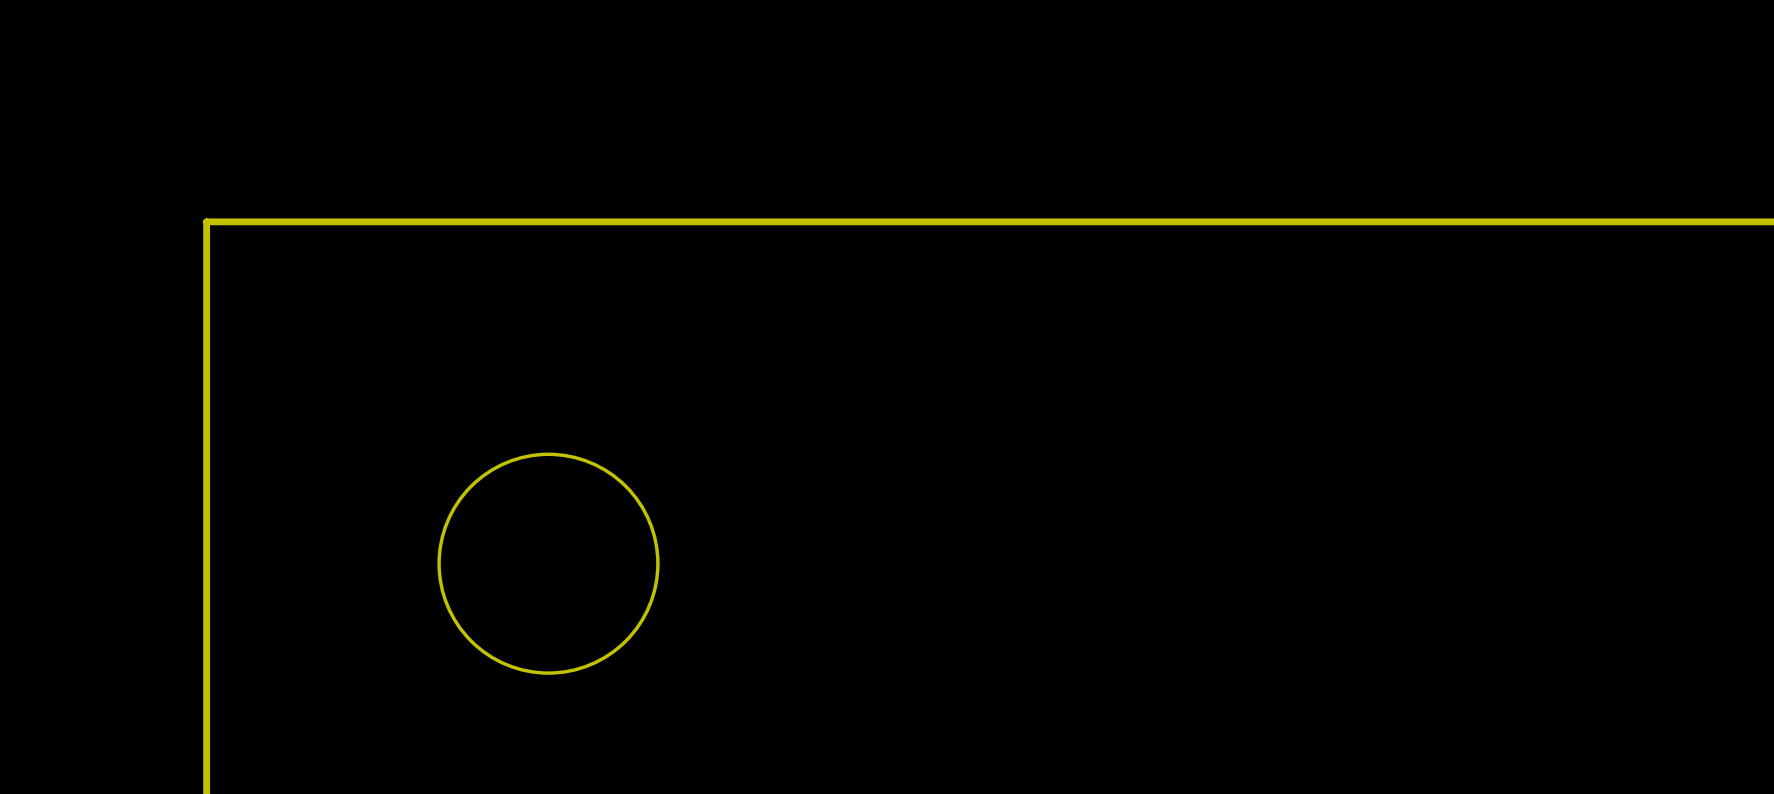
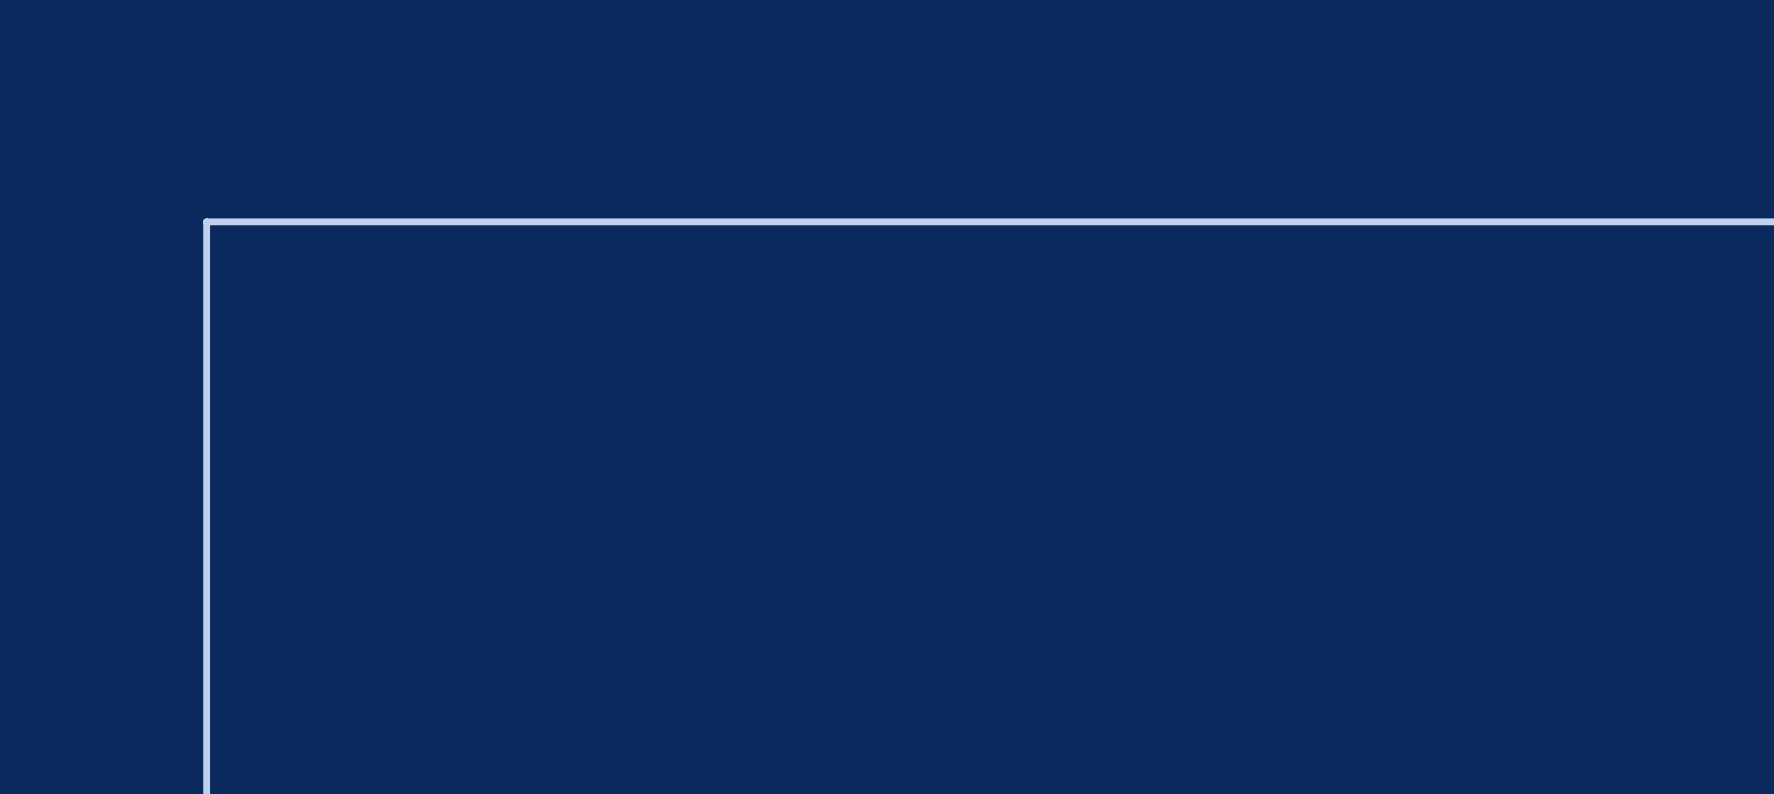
round board edge: [437, 452, 660, 675] -> none

